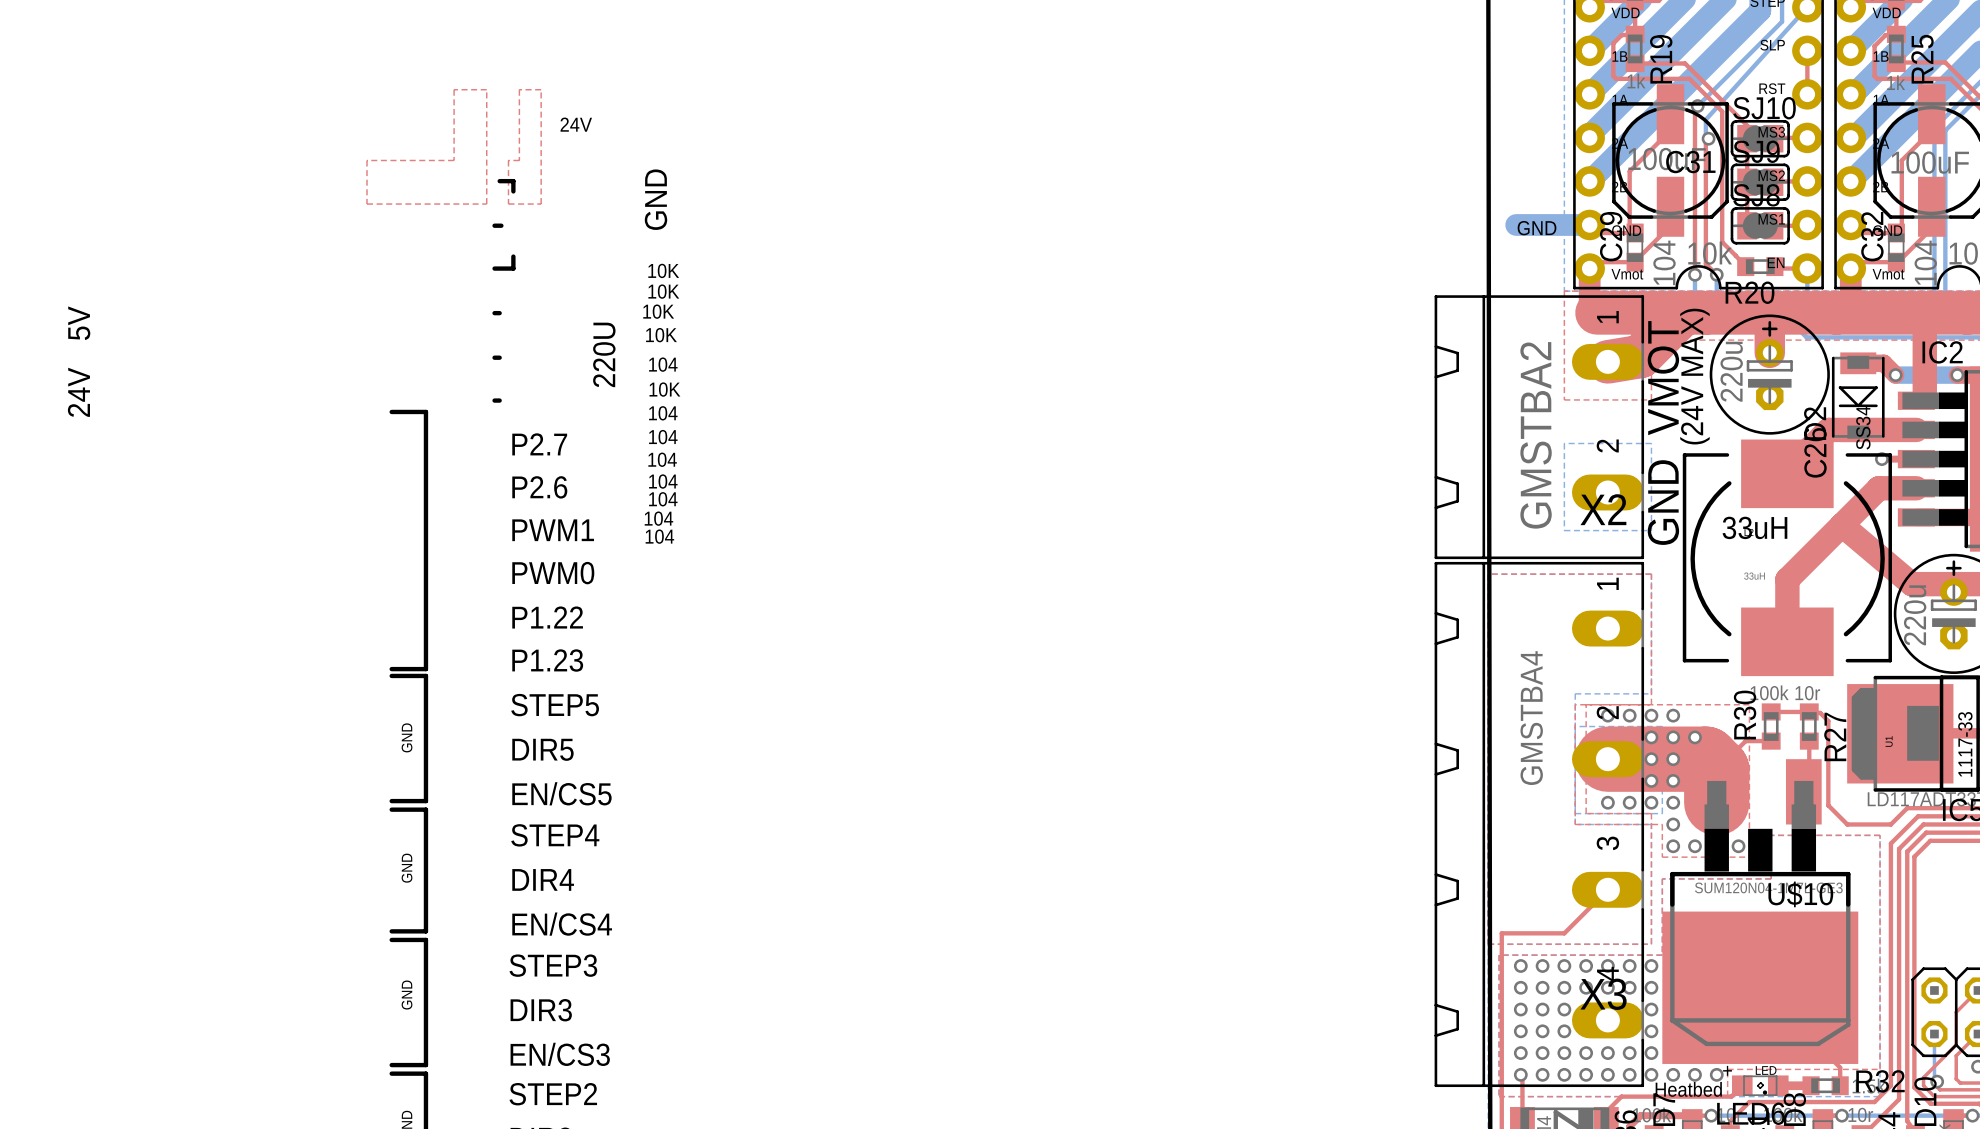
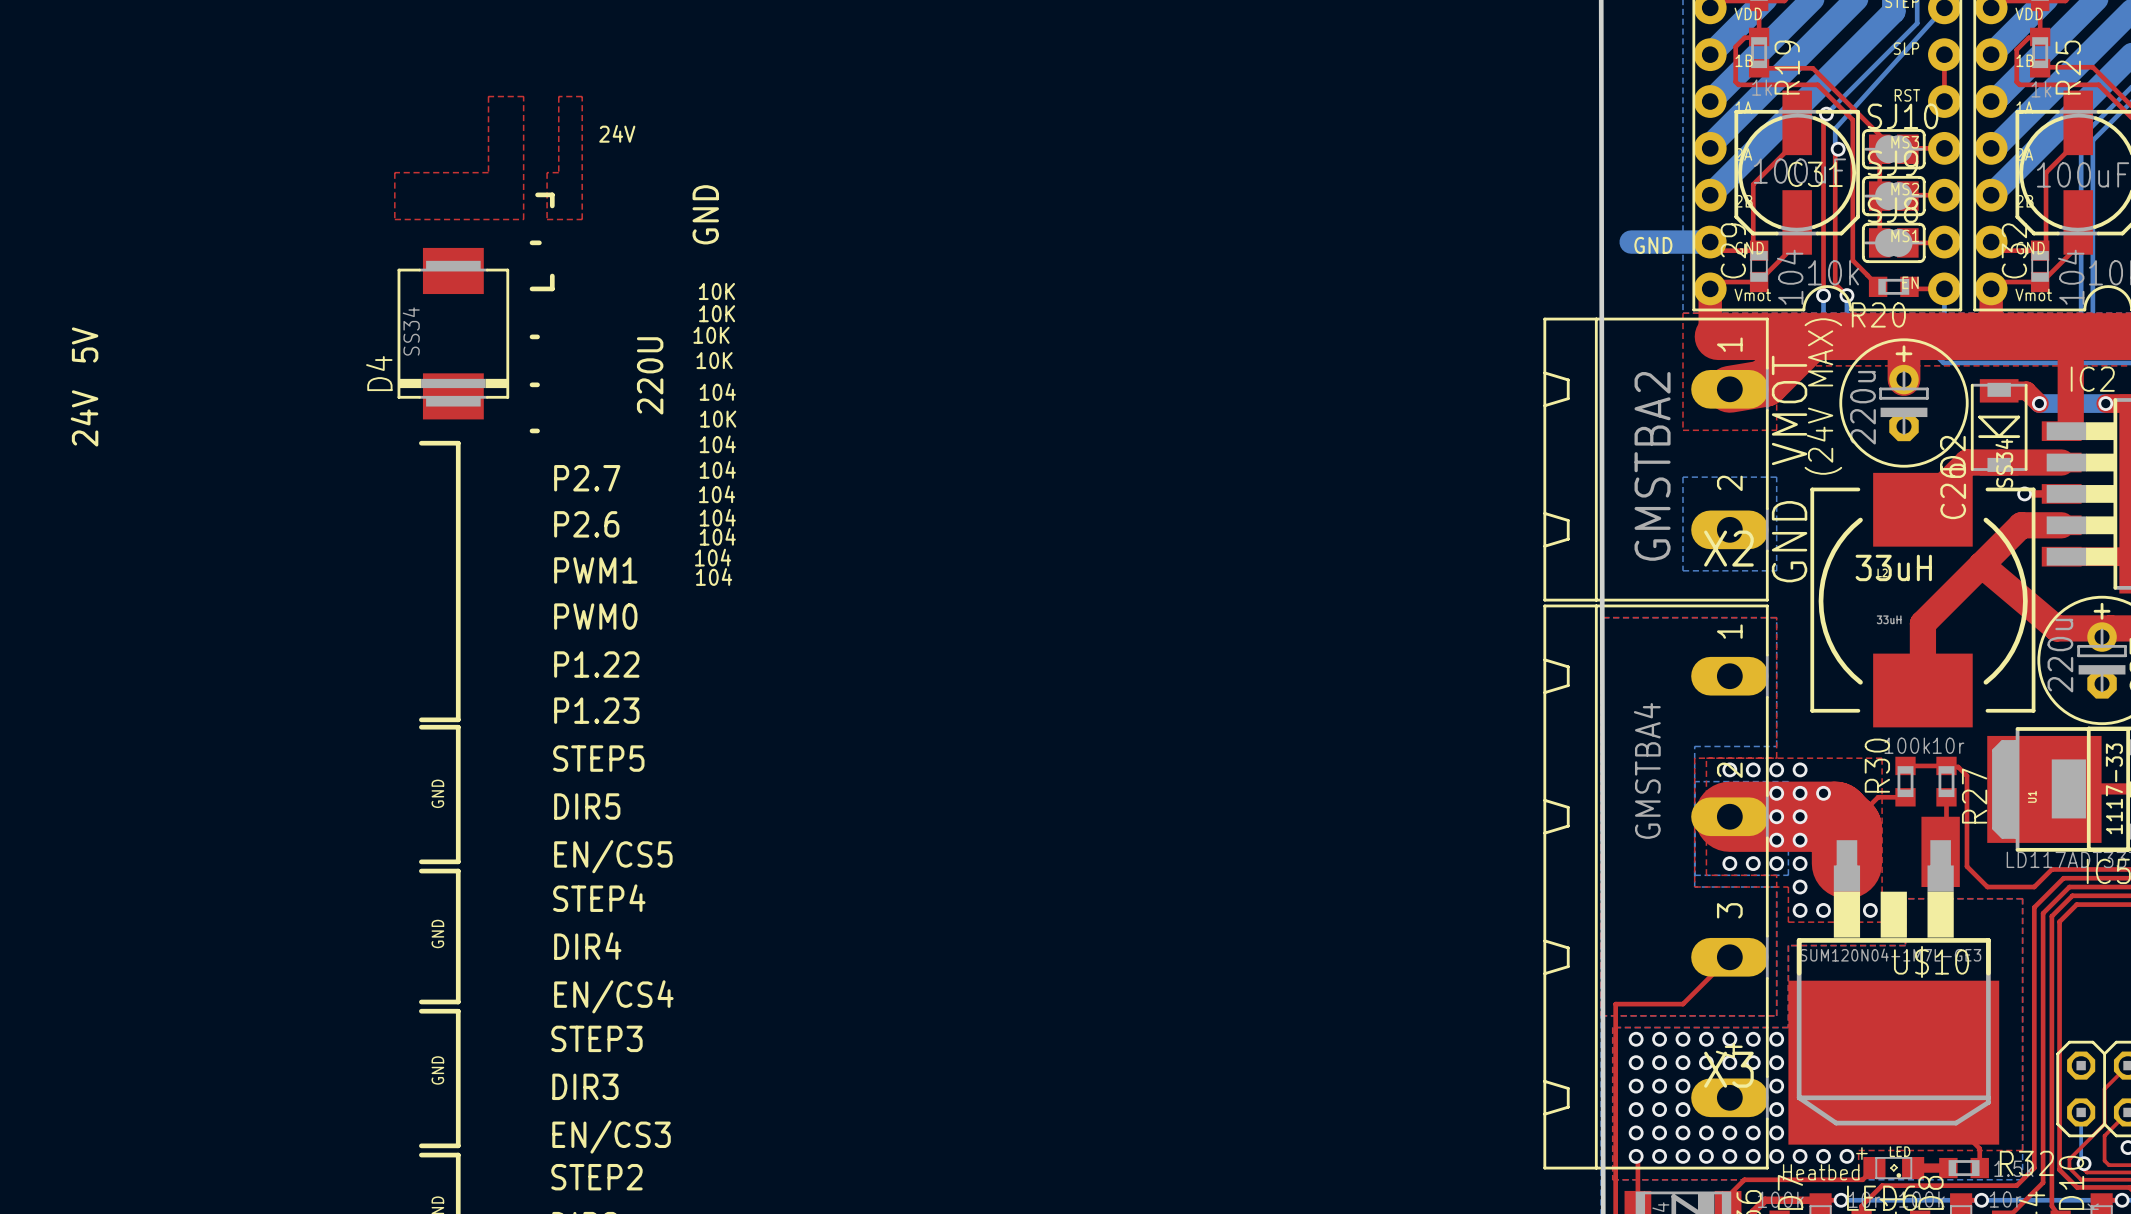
D4: none -> SS34 (453, 333)

